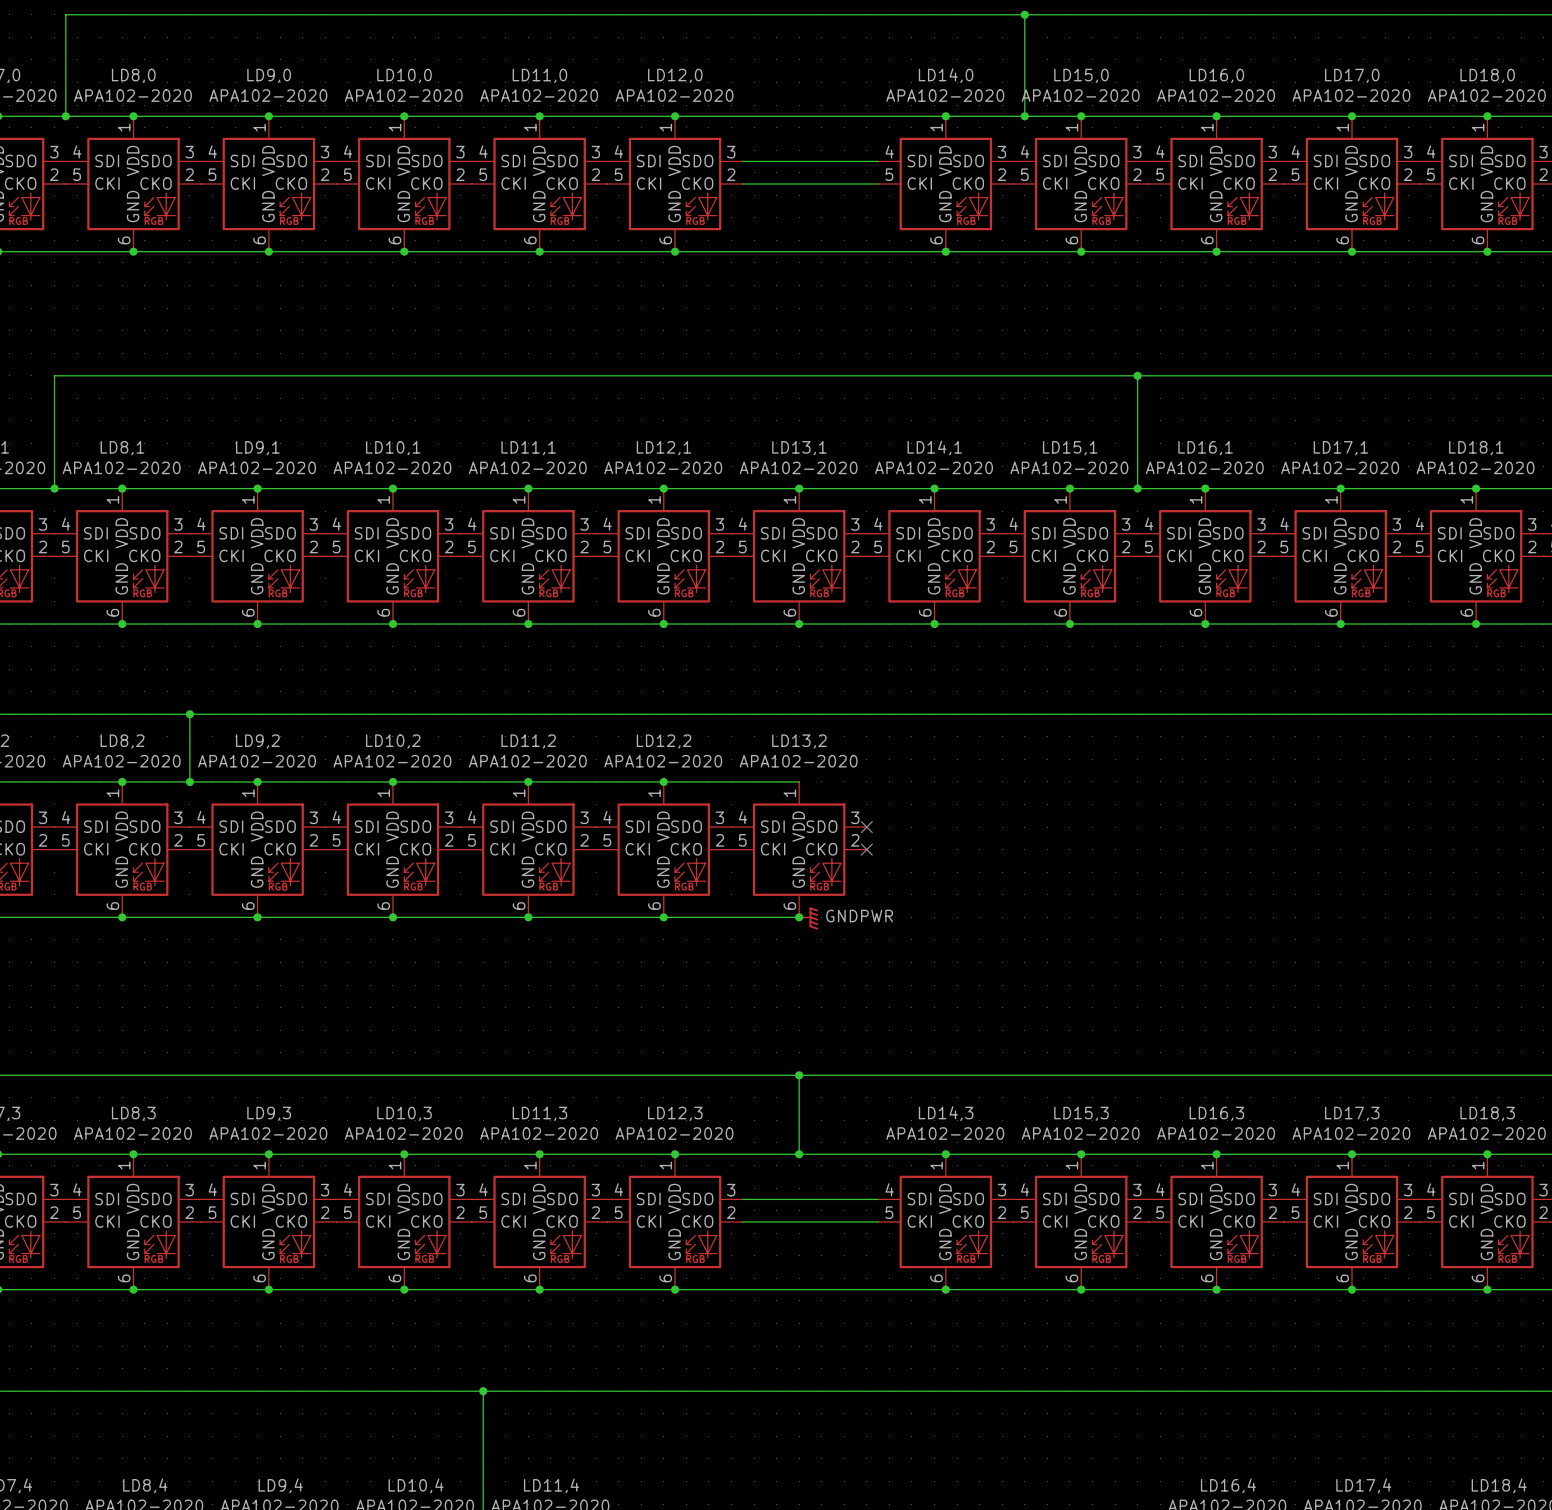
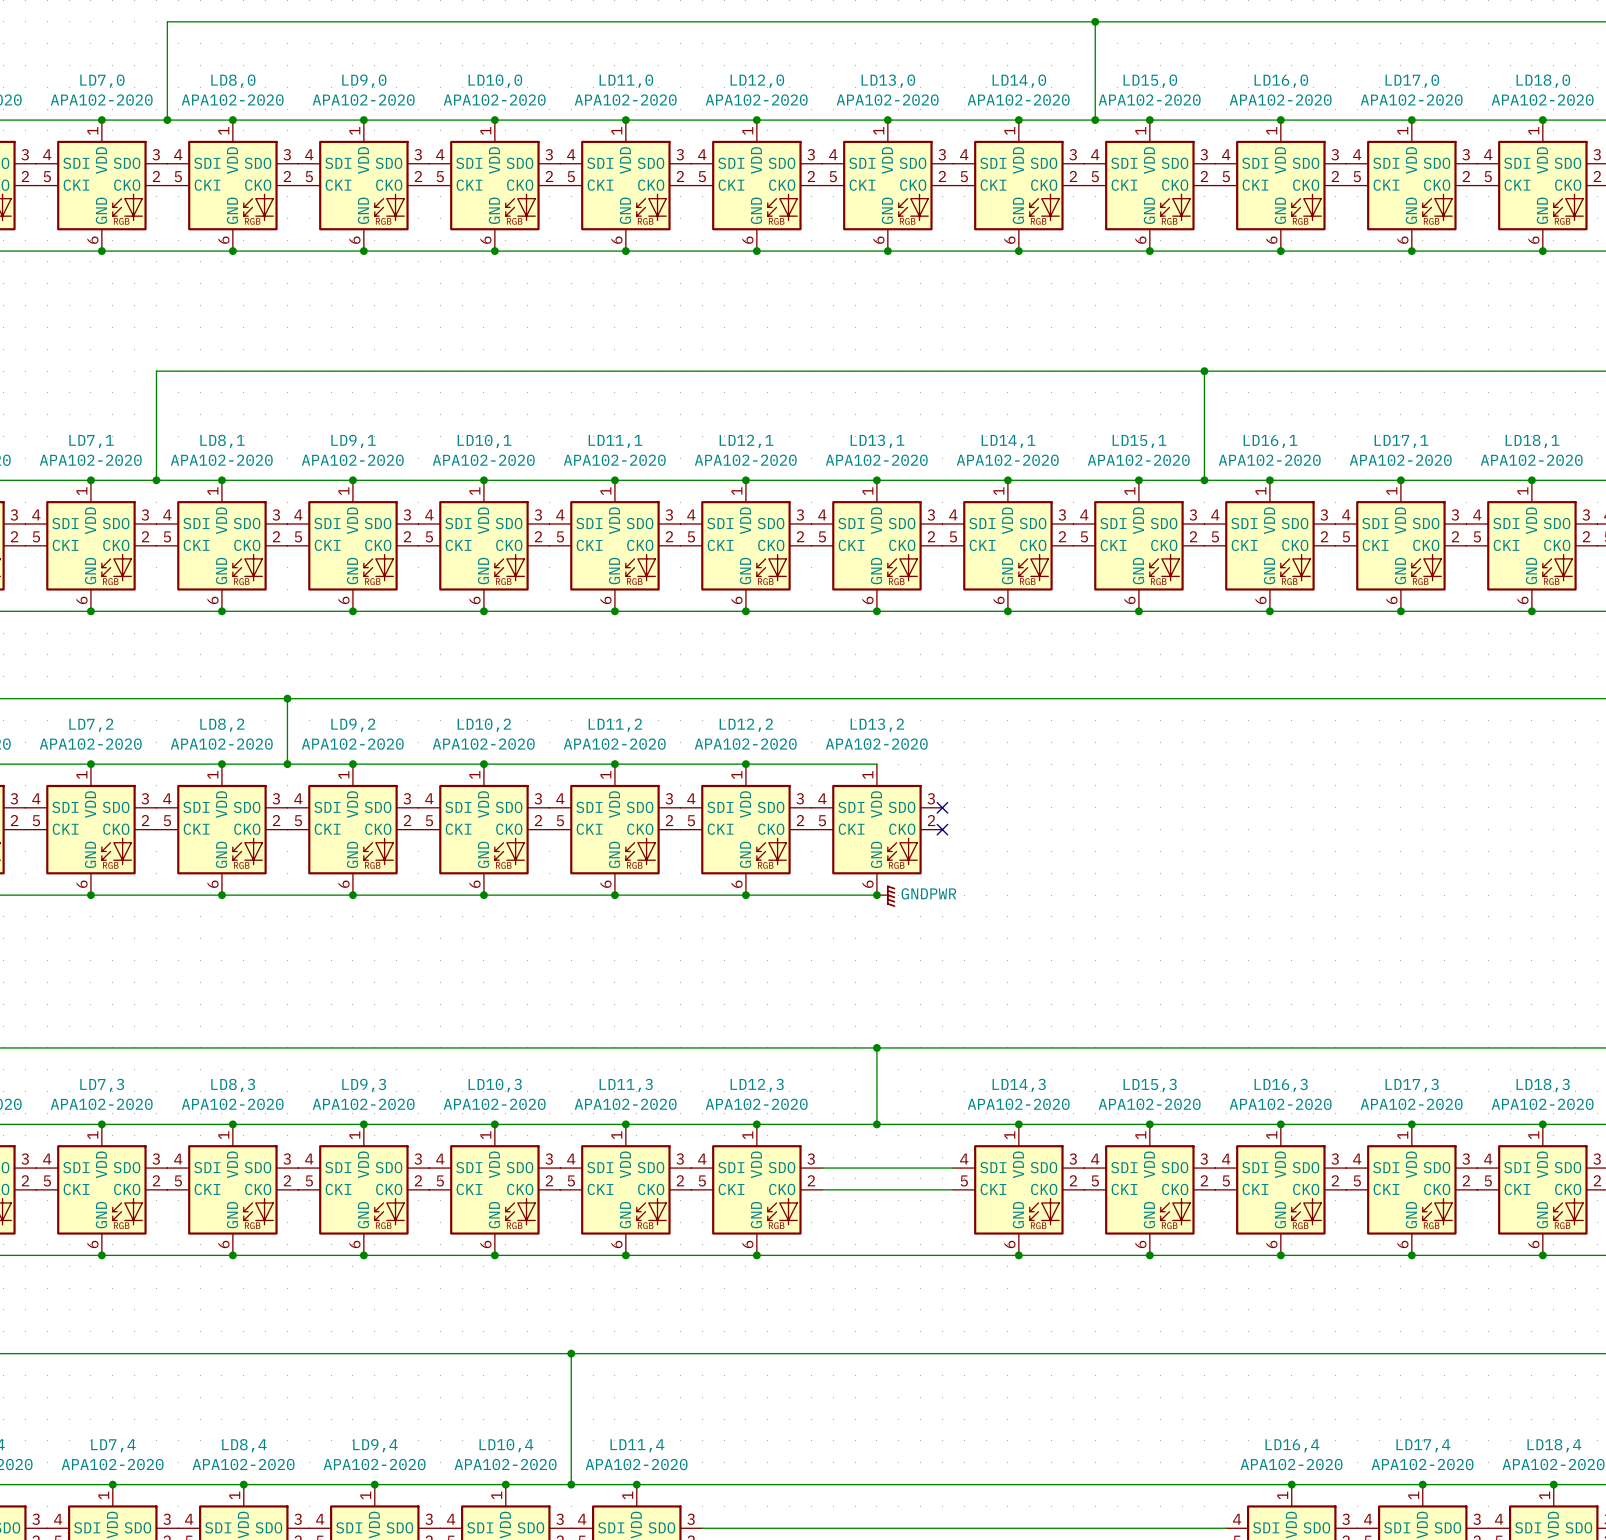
junction: none -> (887, 120)
LD13,0: none -> APA102-2020 (887, 185)
junction: none -> (887, 251)

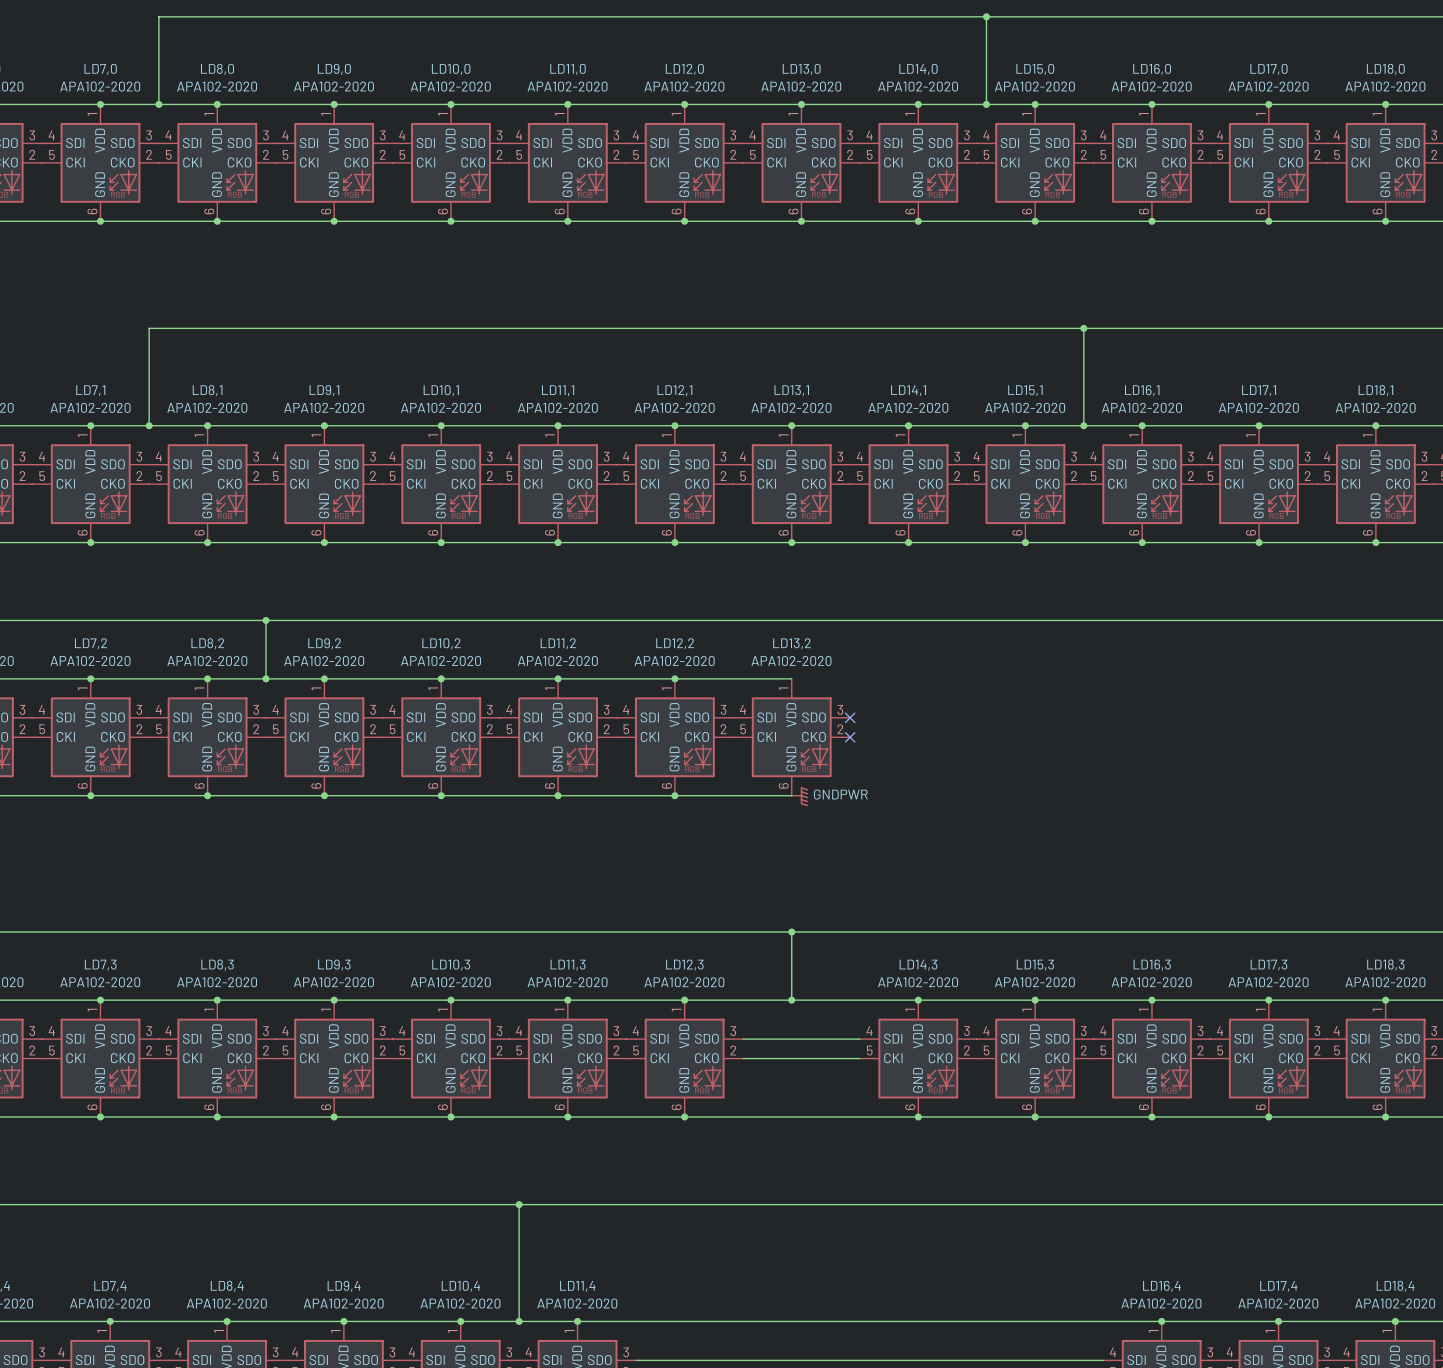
junction: (876, 895) -> none

